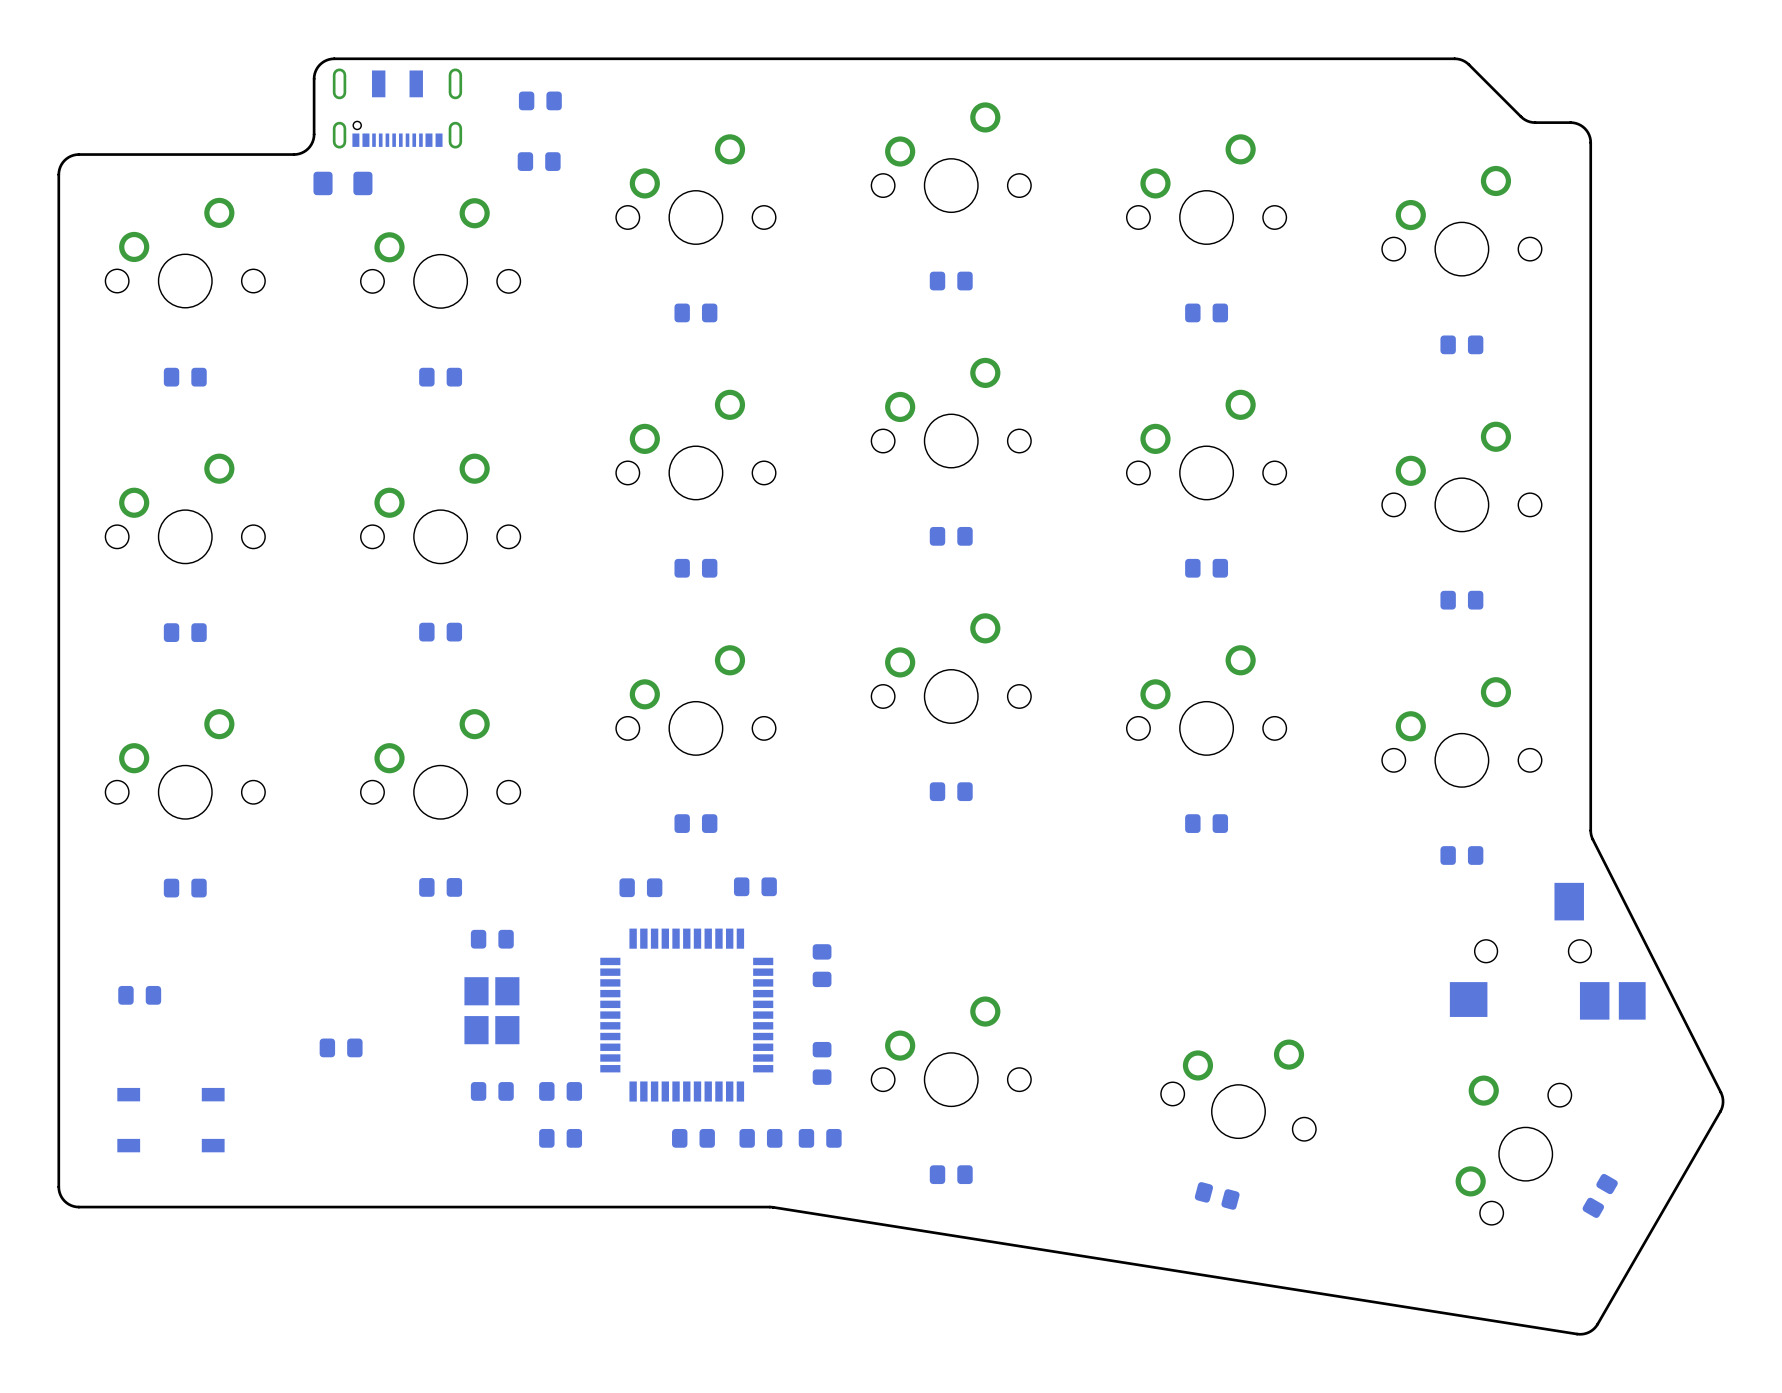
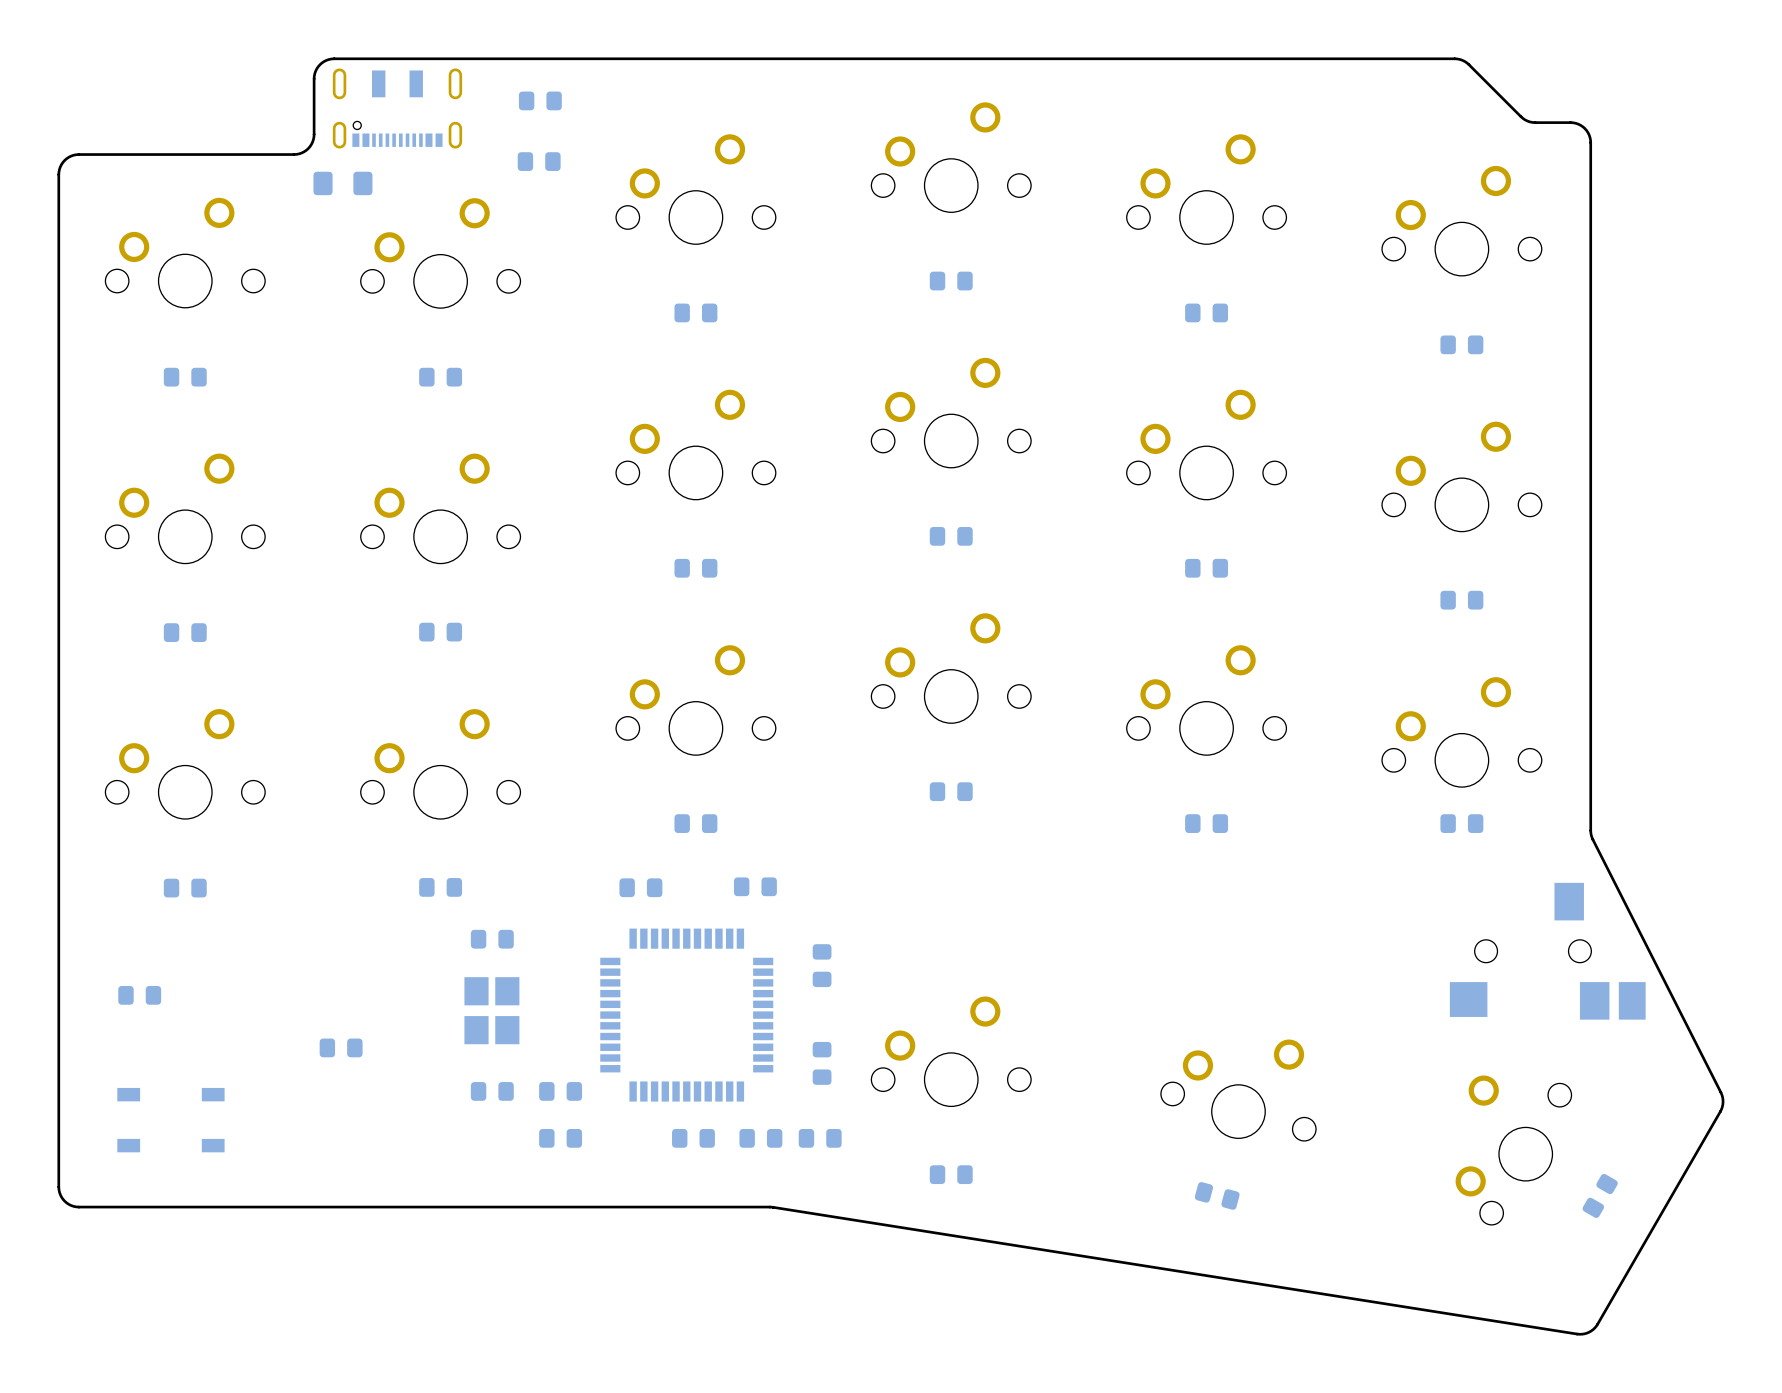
part position: (1461, 855) -> (1461, 823)

